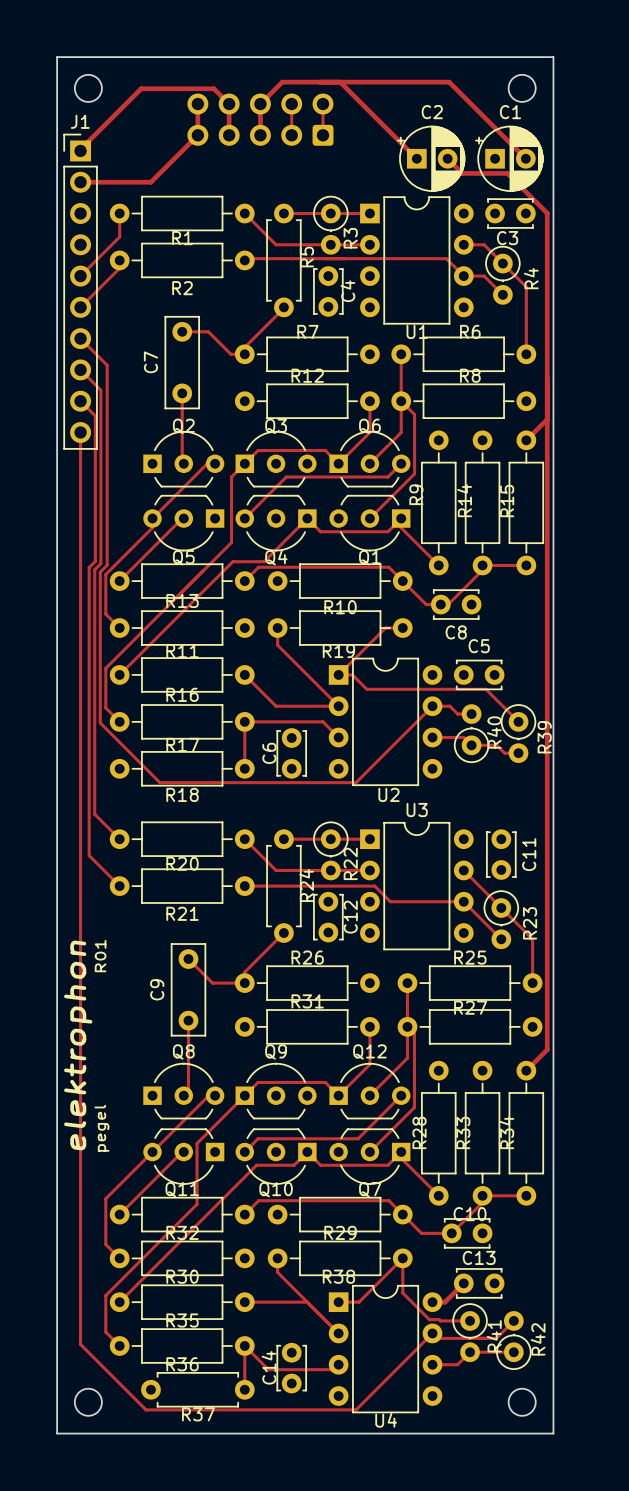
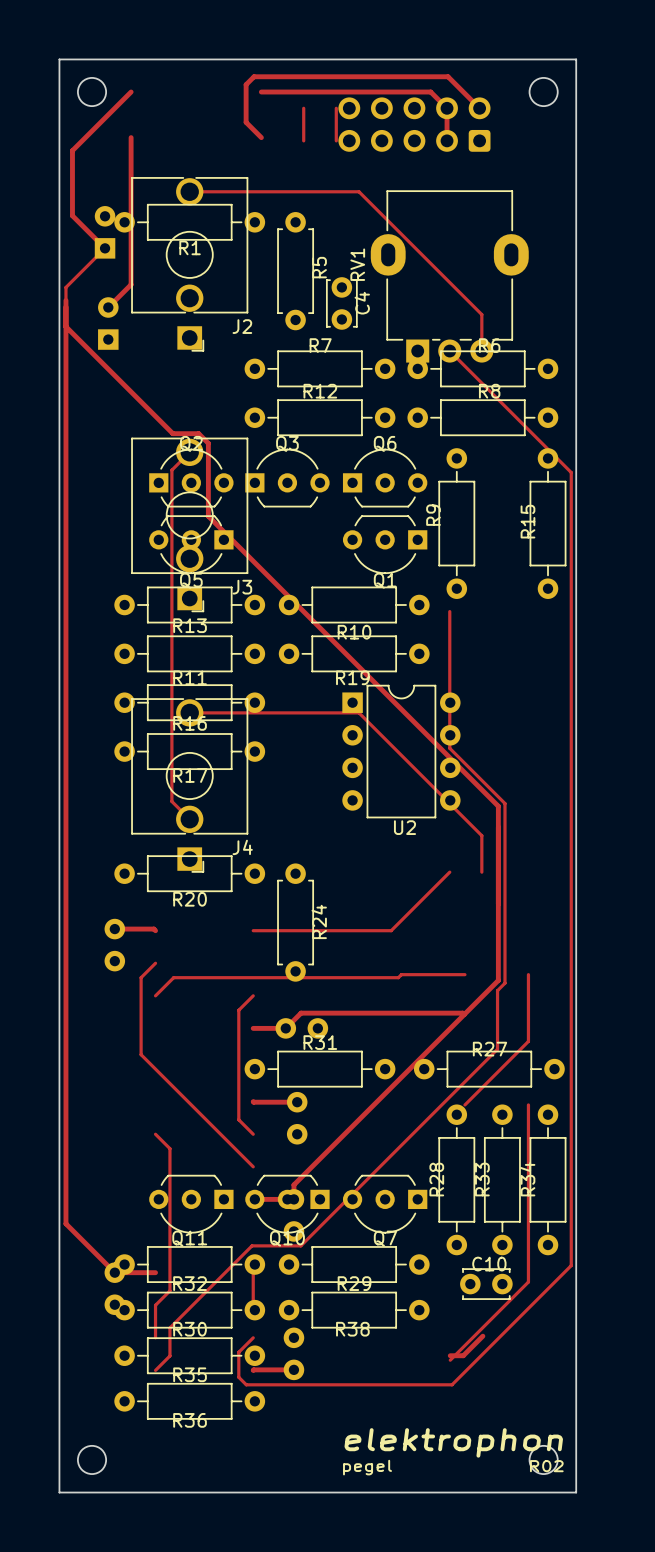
track: (340, 82) (416, 158) -> none
track: none -> (131, 92) (72, 150) (72, 215) (105, 248) (65, 287) (65, 306)
track: none -> (261, 92) (430, 92) (447, 108) (447, 140)
track: (197, 104) (197, 135) (150, 182) (80, 182) -> none
track: none -> (479, 108) (448, 76) (254, 76) (246, 84) (246, 122) (261, 137)
part position: (260, 119) -> (414, 124)
track: none -> (131, 137) (131, 284) (108, 307)
track: (229, 135) (229, 104) (213, 88) (141, 88) (80, 150) -> none
track: (260, 135) (260, 104) (282, 82) (449, 82) (525, 158) -> none
C2: (431, 158) -> none
track: (447, 158) (462, 173) (507, 173) (547, 213) (547, 1049) (526, 1070) -> none
C1: (509, 158) -> none
track: none -> (189, 191) (359, 191) (481, 314) (481, 351)
track: (119, 213) (119, 236) (80, 276) -> none
track: (244, 213) (276, 244) (369, 244) -> none
track: (283, 213) (369, 213) -> none
C3: (510, 213) -> none
part: none -> (105, 232)
R3: (330, 225) -> none
track: (463, 244) (484, 244) (526, 287) (526, 354) -> none
J2: none -> (189, 264)
track: (119, 260) (119, 268) (80, 307) -> none
R2: (182, 260) -> none
track: (244, 260) (246, 258) (446, 258) (463, 276) (484, 276) (502, 294) -> none
U1: (416, 260) -> none
RV1: none -> (449, 276)
R4: (502, 275) -> none
track: none -> (65, 300) (65, 1223) (114, 1272) (155, 1272)
J1: (80, 291) -> none
track: (283, 307) (237, 354) -> none
part: none -> (108, 323)
track: none -> (65, 326) (172, 433) (198, 433) (208, 443) (208, 516) (498, 806) (498, 980) (293, 1184) (293, 1199) (253, 1199)
track: (182, 331) (208, 331) (230, 354) (244, 354) -> none
track: none -> (449, 351) (571, 472) (571, 1265) (452, 1384) (246, 1384) (238, 1377) (238, 1352) (253, 1337)
track: (80, 338) (107, 365) (107, 565) (100, 572) (100, 722) (159, 782) (356, 782) (432, 706) (449, 706) (457, 714) (471, 714) -> none
track: (401, 354) (401, 432) (369, 463) -> none
C7: (182, 362) -> none
track: (80, 369) (100, 390) (100, 563) (94, 569) (94, 814) (119, 839) -> none
track: (182, 393) (182, 462) (183, 463) -> none
track: (80, 401) (95, 416) (95, 561) (89, 567) (89, 855) (119, 886) -> none
track: (369, 401) (369, 432) (338, 463) (325, 450) (258, 450) (231, 477) (231, 542) (105, 668) (105, 708) (119, 721) -> none
track: (401, 401) (414, 414) (414, 473) (369, 518) -> none
track: (547, 419) (526, 440) -> none
track: (80, 432) (80, 1344) (146, 1409) (356, 1409) (432, 1333) (437, 1338) (496, 1338) (513, 1320) -> none
track: none -> (189, 452) (171, 470) (171, 801) (189, 819)
track: (215, 463) (207, 463) (152, 518) (152, 527) (105, 574) (105, 614) (119, 628) -> none
track: (401, 463) (387, 477) (286, 477) (244, 518) -> none
R14: (482, 502) -> none
J3: none -> (189, 524)
track: (183, 518) (119, 581) -> none
Q4: (276, 523) -> none
track: (438, 565) (401, 527) (401, 518) (387, 531) (320, 531) (307, 518) (264, 561) (232, 561) (119, 674) -> none
track: (526, 565) (487, 565) (448, 604) (426, 604) (388, 567) (258, 567) (244, 581) -> none
track: none -> (449, 611) (449, 748) (504, 803) (504, 983) (497, 990) (497, 1049) (300, 1245) (252, 1245) (169, 1327) (169, 1355) (155, 1370)
C8: (456, 604) -> none
track: (277, 628) (277, 645) (338, 706) (276, 706) (244, 674) -> none
track: (402, 628) (385, 628) (338, 674) (352, 674) (366, 689) (485, 689) (518, 721) -> none
C5: (479, 674) -> none
track: none -> (189, 712) (359, 712) (481, 835) (481, 872)
R40: (471, 733) -> none
R39: (518, 733) -> none
track: (338, 737) (323, 721) (244, 721) (244, 768) -> none
track: (432, 737) (463, 737) (471, 745) (496, 745) (504, 753) (518, 753) -> none
C6 side: top (291, 753) -> bottom (114, 945)
J4: none -> (189, 785)
R18: (182, 768) -> none
track: none -> (449, 872) (391, 930) (253, 930)
track: (244, 839) (276, 870) (369, 870) -> none
track: (283, 839) (369, 839) -> none
R22: (330, 850) -> none
C11: (501, 854) -> none
track: (463, 870) (532, 939) (532, 983) -> none
R21: (182, 886) -> none
track: (244, 886) (374, 886) (390, 901) (463, 901) (501, 939) -> none
U3: (416, 886) -> none
track: none -> (114, 929) (153, 929) (155, 930)
C12: (328, 917) -> none
R23: (501, 919) -> none
track: none -> (155, 963) (141, 977) (141, 1054) (253, 1166)
track: (283, 933) (244, 972) (244, 983) (212, 983) (188, 959) -> none
track: none -> (464, 974) (401, 974) (398, 977) (173, 977) (155, 995)
track: none -> (528, 974) (528, 1041) (464, 1104)
drawing: [64, 939, 110, 1152] -> none
track: none -> (253, 995) (238, 1010) (238, 1119) (253, 1134)
track: none -> (464, 1014) (301, 1013) (285, 1028) (253, 1028)
R26: (307, 983) -> none
track: (407, 983) (407, 1058) (369, 1095) -> none
R25: (470, 983) -> none
part: none -> (301, 1028)
C9: (188, 989) -> none
track: (188, 1020) (188, 1091) (183, 1095) -> none
track: (369, 1026) (369, 1064) (338, 1095) (325, 1082) (258, 1082) (197, 1143) (197, 1204) (105, 1295) (105, 1332) (119, 1345) -> none
track: (407, 1026) (414, 1033) (414, 1107) (369, 1152) -> none
track: none -> (253, 1101) (297, 1102)
track: none -> (528, 1104) (528, 1282) (450, 1360)
part: none -> (297, 1118)
track: none -> (155, 1134) (169, 1148) (169, 1290) (155, 1305) (155, 1337)
Q8: (183, 1091) -> none
Q9: (276, 1091) -> none
Q12: (369, 1091) -> none
track: (215, 1095) (208, 1095) (105, 1198) (105, 1244) (119, 1258) -> none
track: (401, 1095) (358, 1138) (258, 1138) (244, 1152) -> none
track: (183, 1152) (119, 1214) -> none
part: none -> (293, 1215)
track: (438, 1195) (401, 1158) (401, 1152) (387, 1165) (320, 1165) (307, 1152) (294, 1165) (256, 1165) (119, 1302) -> none
track: (526, 1195) (482, 1195) (482, 1202) (451, 1233) (421, 1233) (388, 1200) (258, 1200) (244, 1214) -> none
track: none -> (253, 1272) (253, 1305)
part: none -> (114, 1288)
track: (277, 1258) (277, 1272) (338, 1333) -> none
C13: (479, 1283) -> none
part: none -> (293, 1353)
track: (244, 1302) (307, 1302) -> none
track: (338, 1302) (358, 1302) (402, 1258) (402, 1292) (429, 1319) (470, 1320) -> none
track: none -> (293, 1369) (253, 1370)
R41: (470, 1332) -> none
R42: (513, 1340) -> none
U4: (385, 1349) -> none
track: (513, 1352) (470, 1352) (457, 1364) (432, 1364) -> none
track: (338, 1364) (333, 1369) (268, 1369) (244, 1345) (244, 1389) -> none
C14: (291, 1368) -> none
drawing: none -> [343, 1428, 564, 1476]
R37: (197, 1389) -> none

